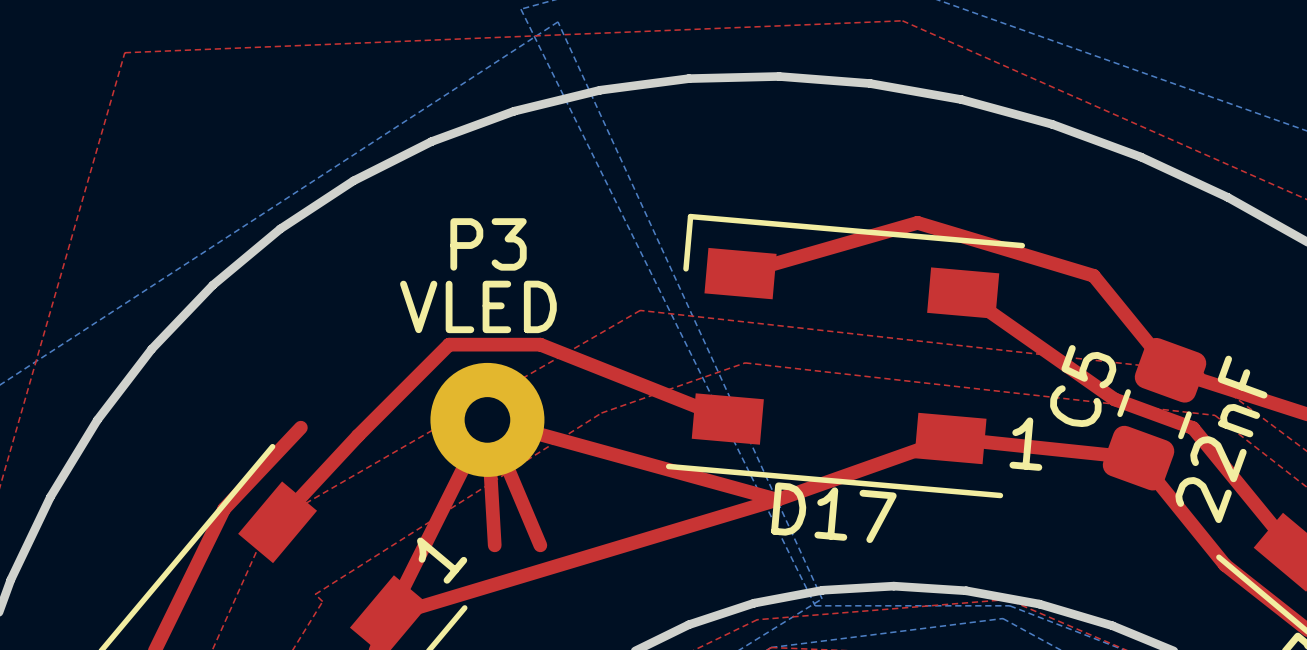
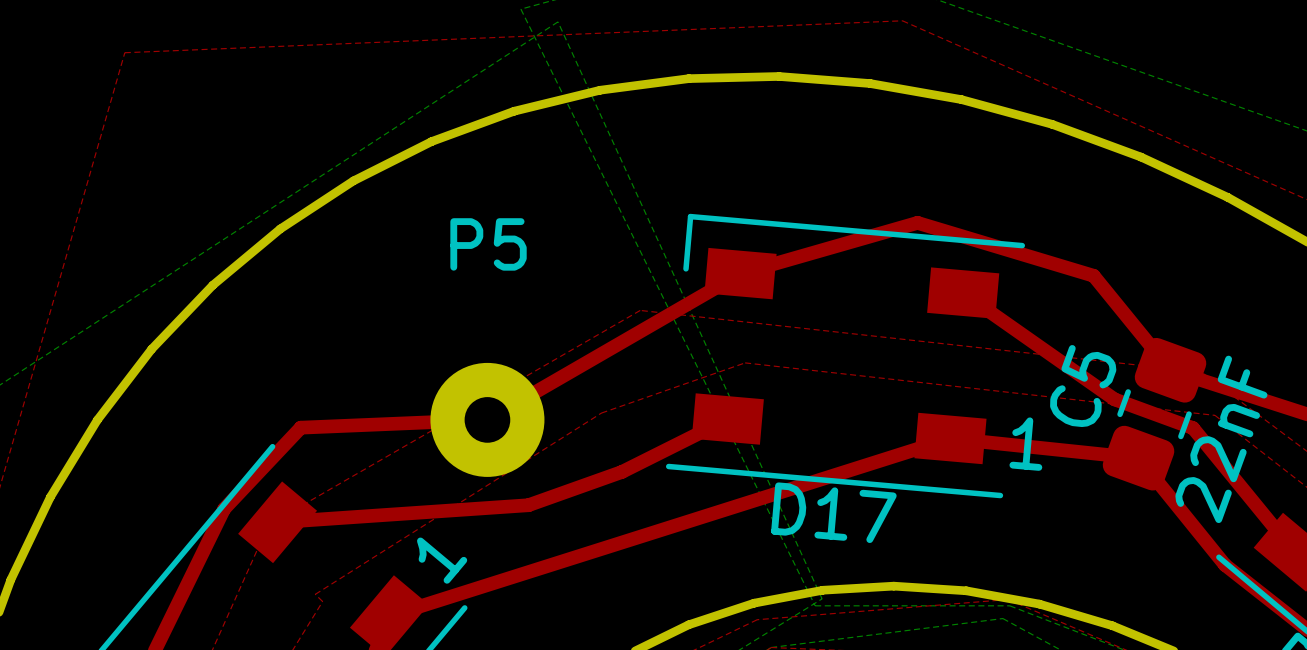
P3 name: P3 (488, 244) -> P5 (488, 244)
top track: none -> (740, 273) (487, 419) (300, 427)
P3 value: VLED (478, 306) -> none
top track: (487, 419) (389, 616) (777, 499) -> none
top track: (487, 419) (777, 499) -> none
top track: (487, 419) (494, 545) -> none
top track: (487, 419) (540, 545) -> none
top track: (727, 419) (540, 344) (449, 344) (357, 435) (277, 522) -> (727, 419) (621, 471) (528, 505) (277, 522)
top track: (950, 438) (777, 499) -> (950, 438) (389, 616)

